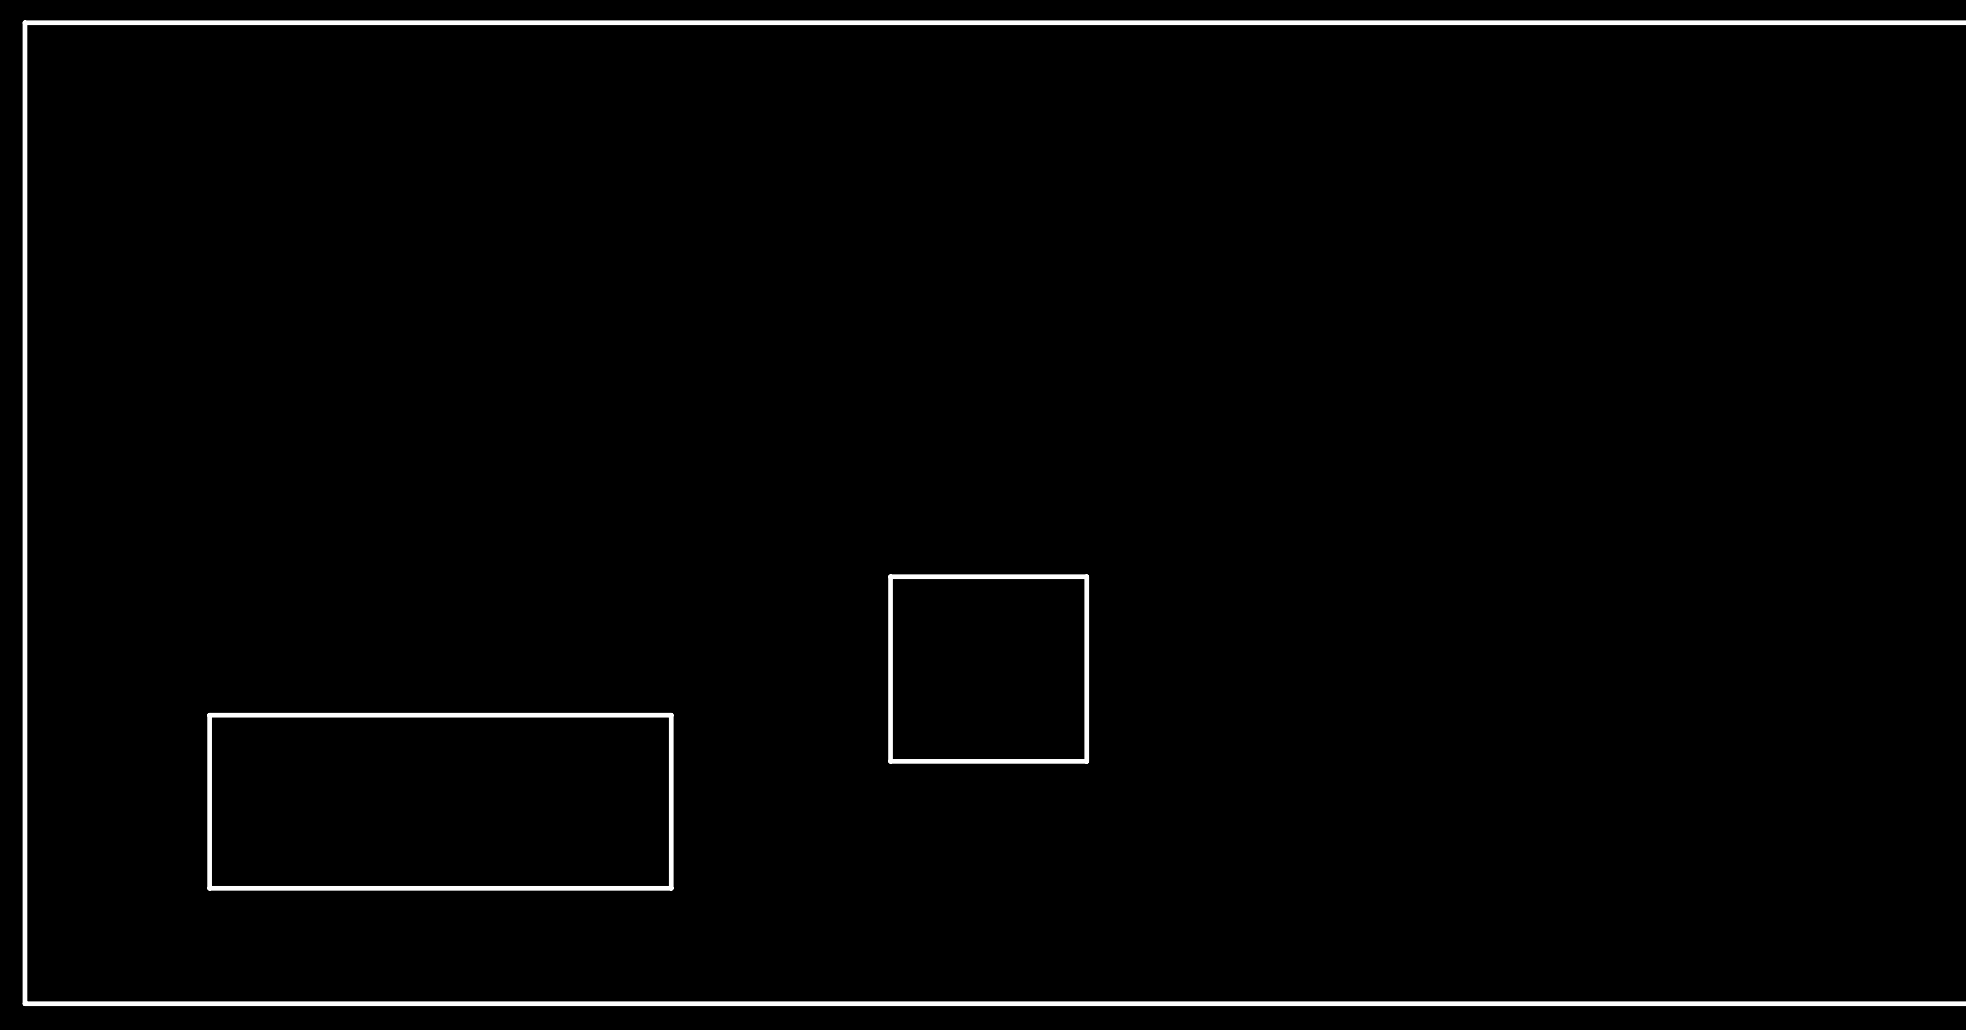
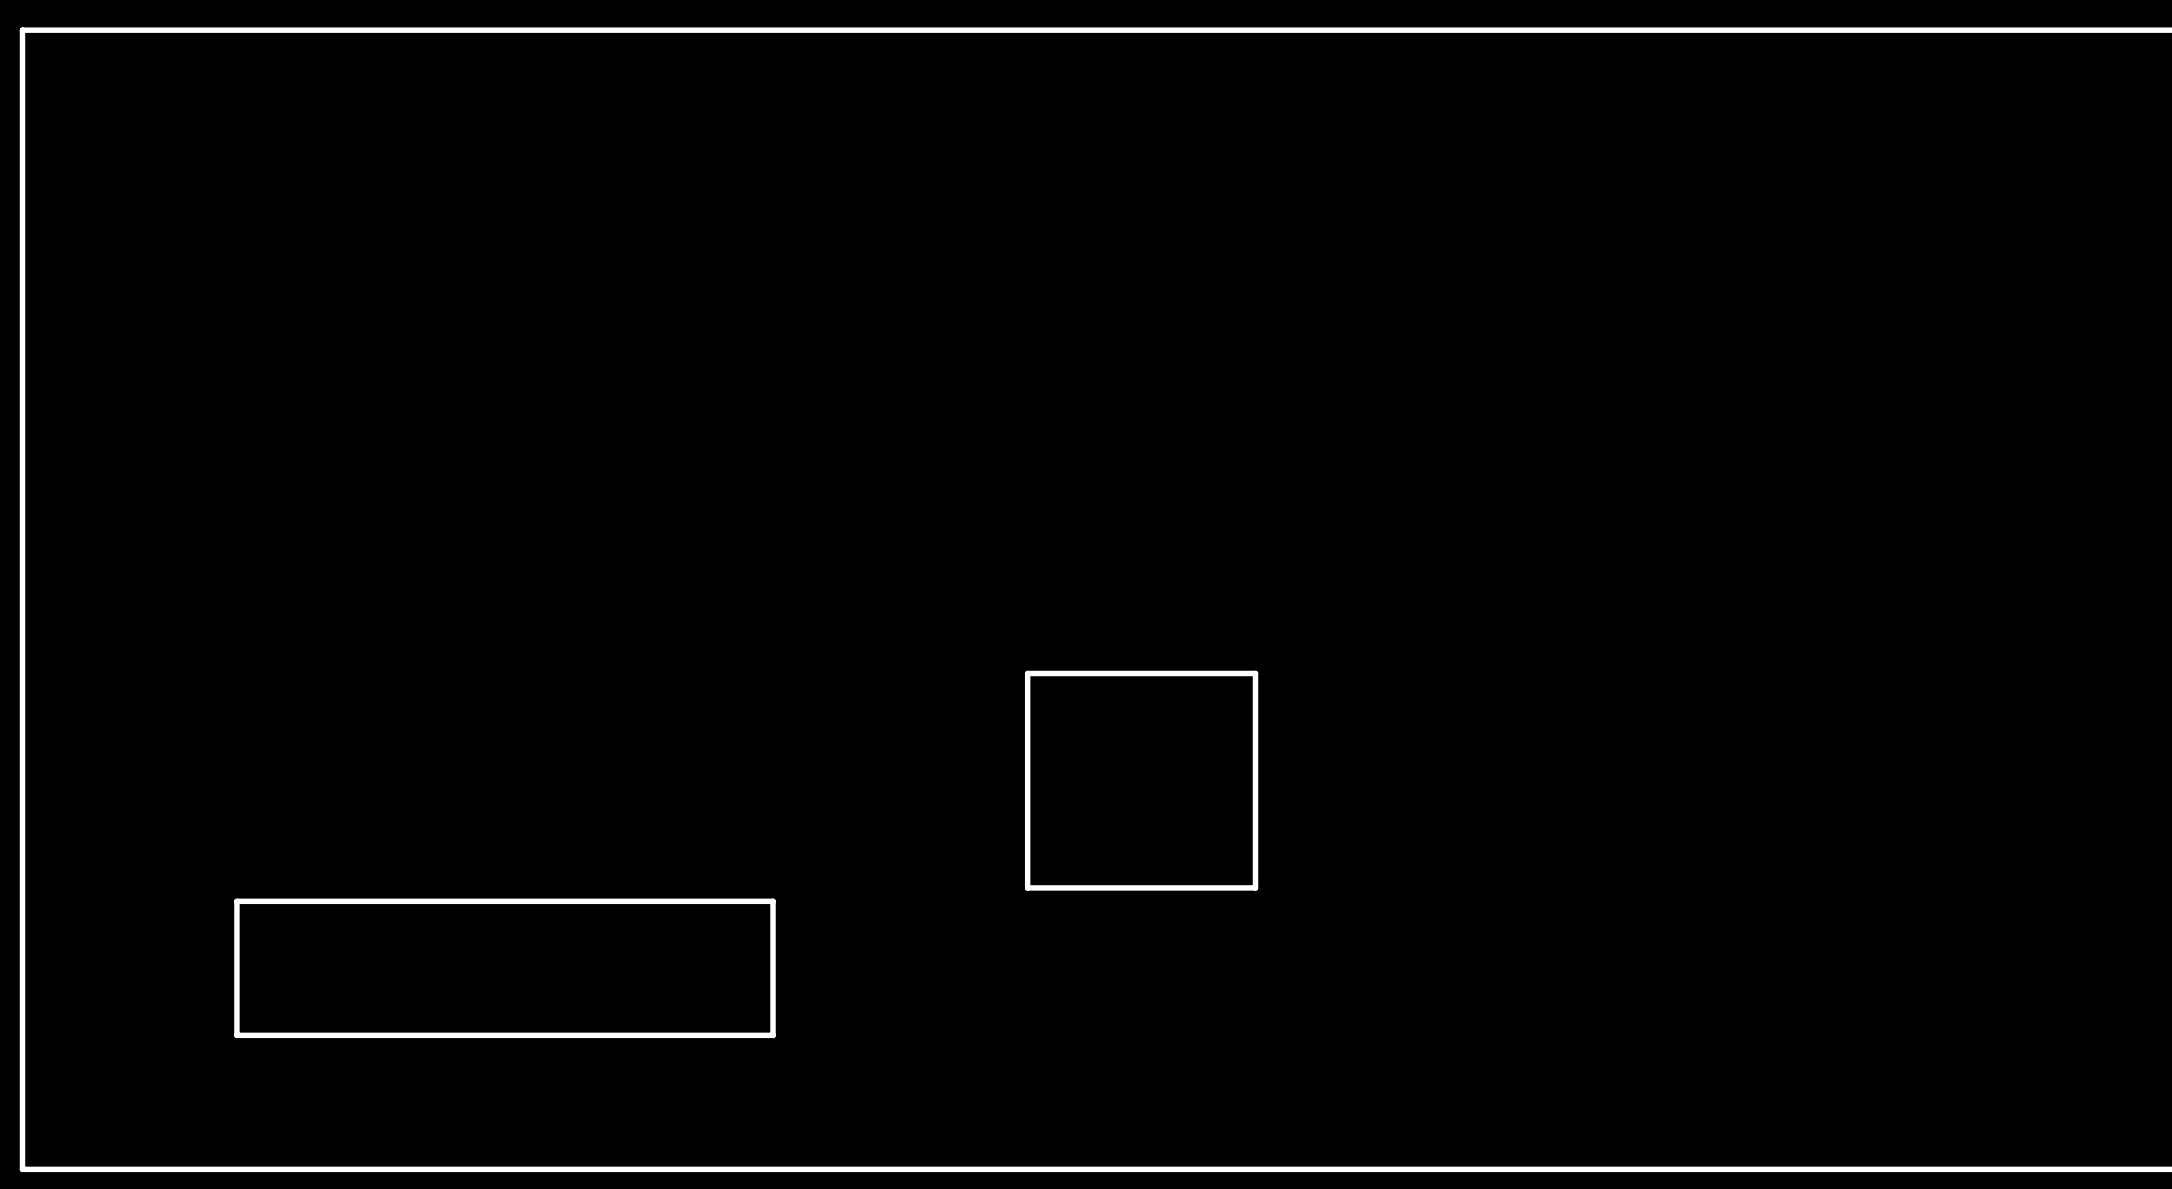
board edge: (671, 772) (671, 715) (209, 715) (209, 772) -> (773, 901) (236, 901)

